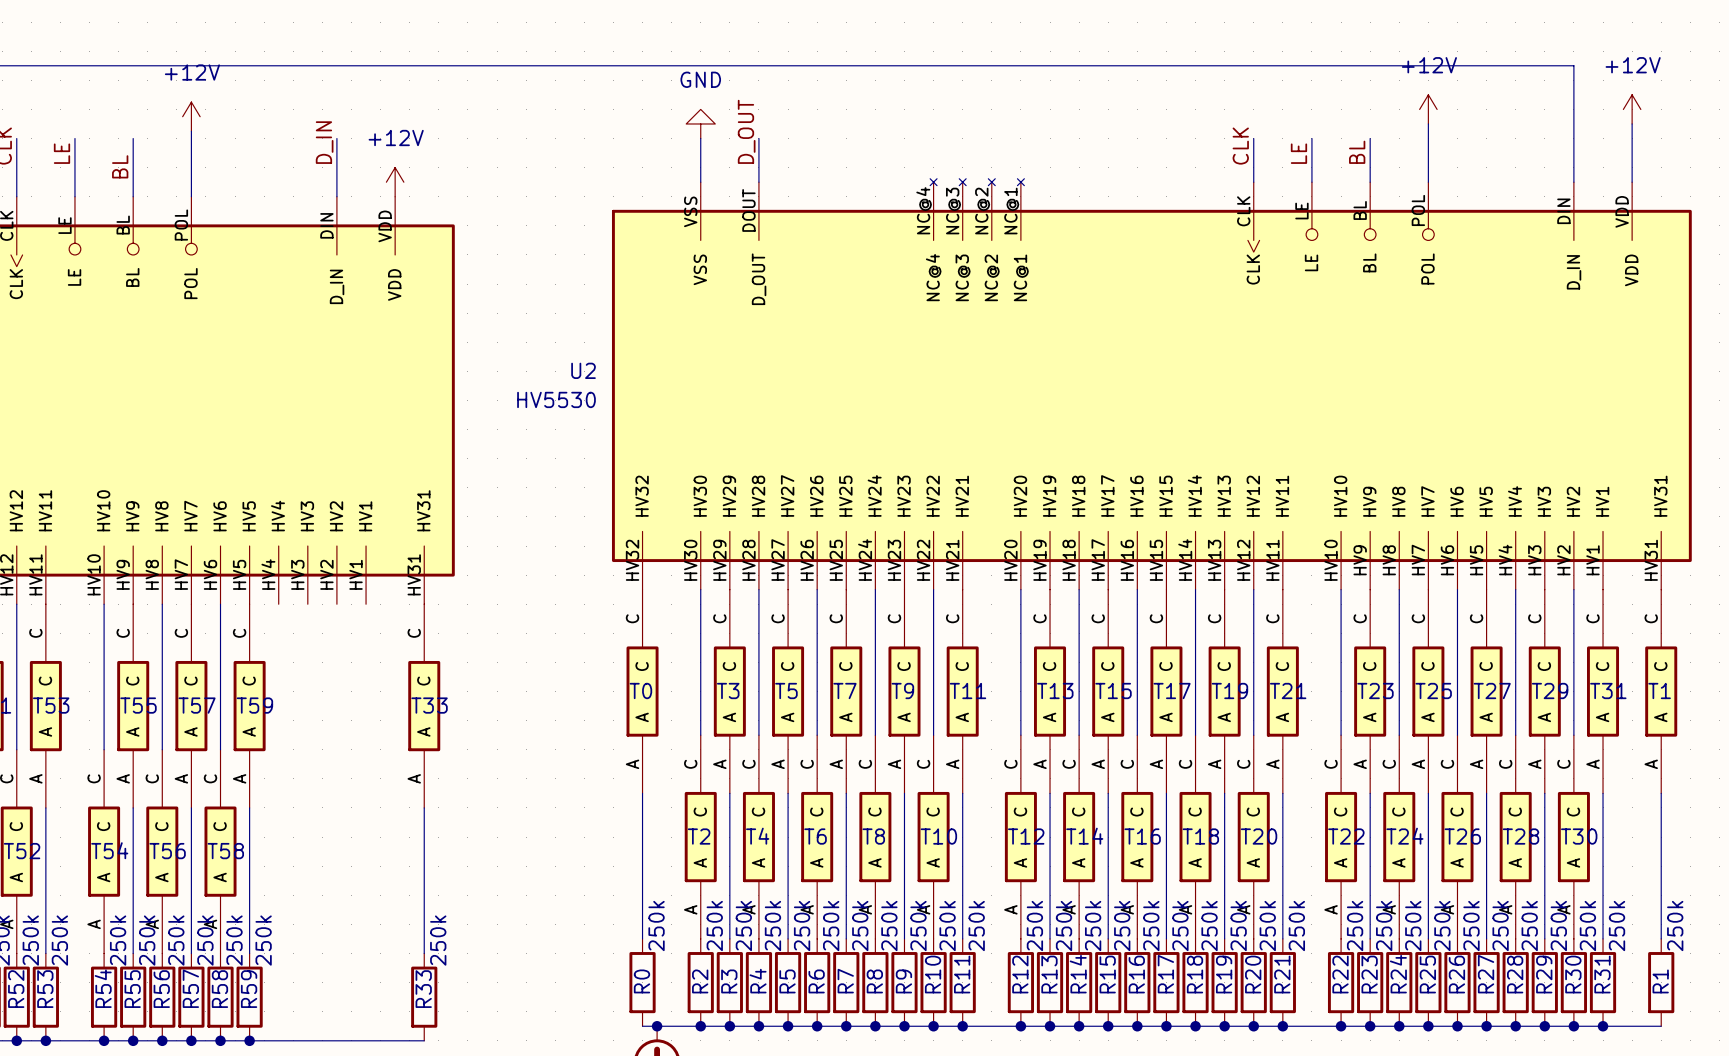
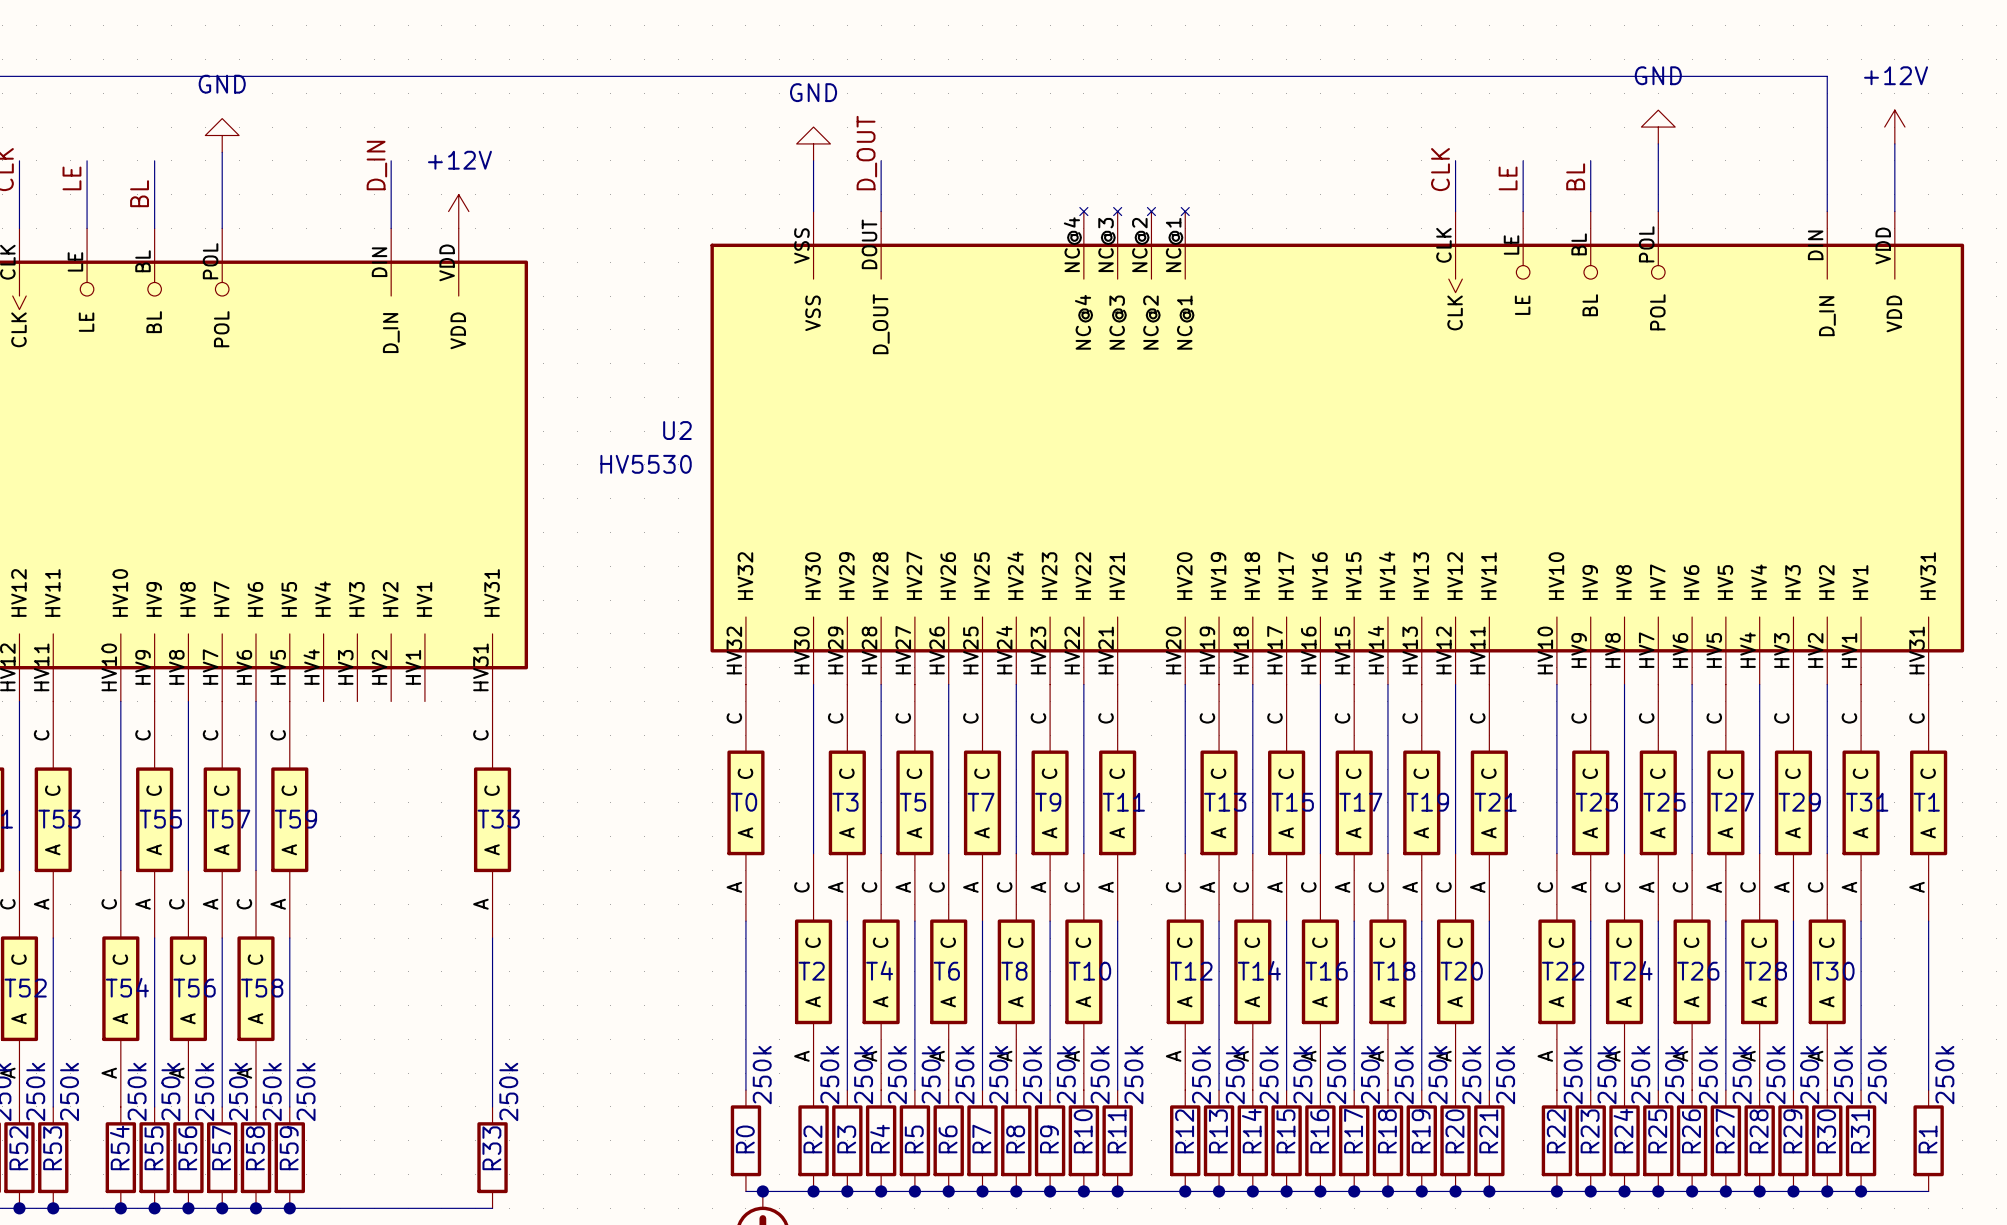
power symbol: +12V (1428, 109) -> GND (1658, 127)
power symbol: +12V (191, 116) -> GND (222, 135)

